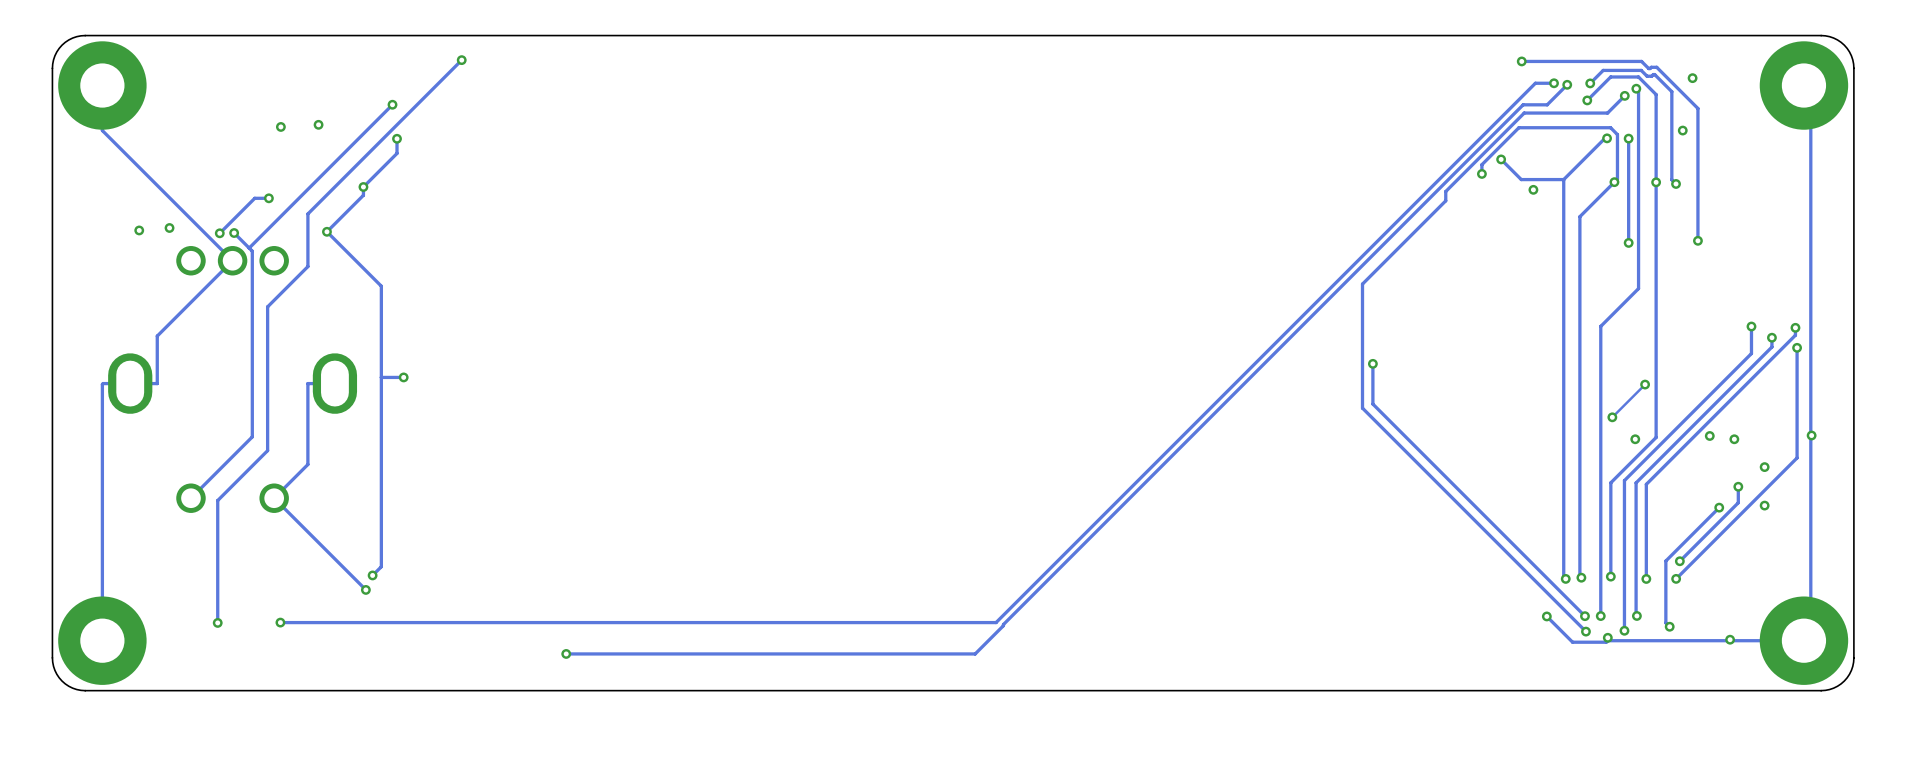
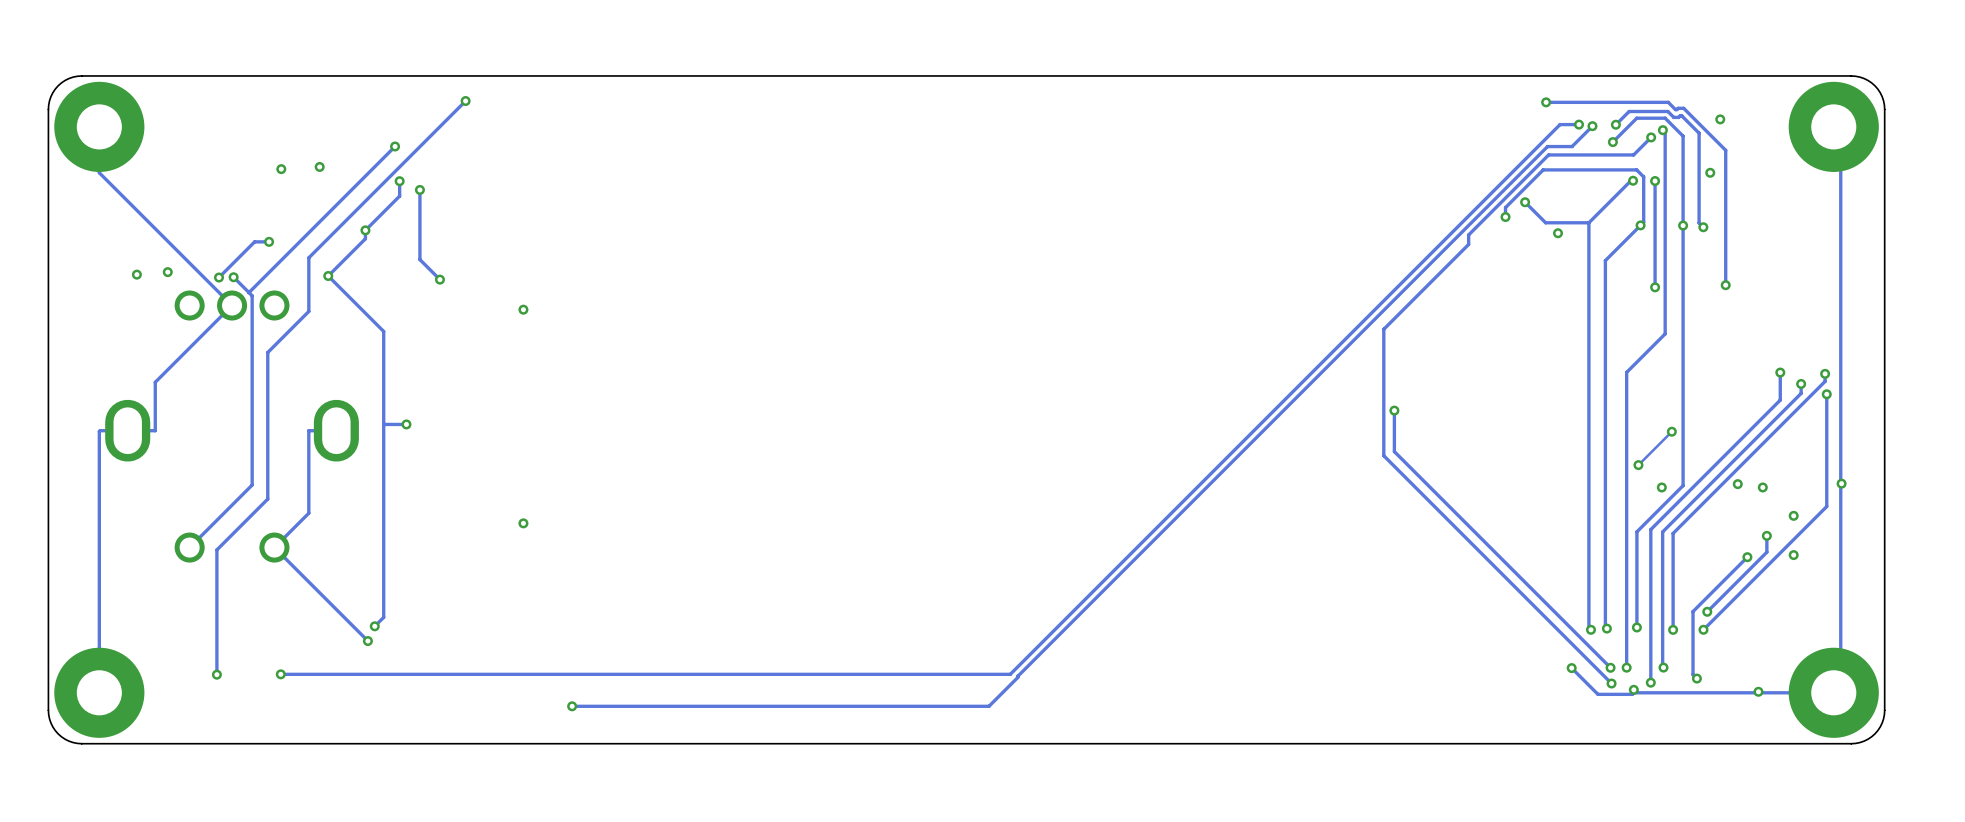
track: none -> (419, 189) (419, 259) (439, 279)
via: none -> (419, 189)
via: none -> (439, 279)
via: none -> (523, 309)
via: none -> (523, 523)

